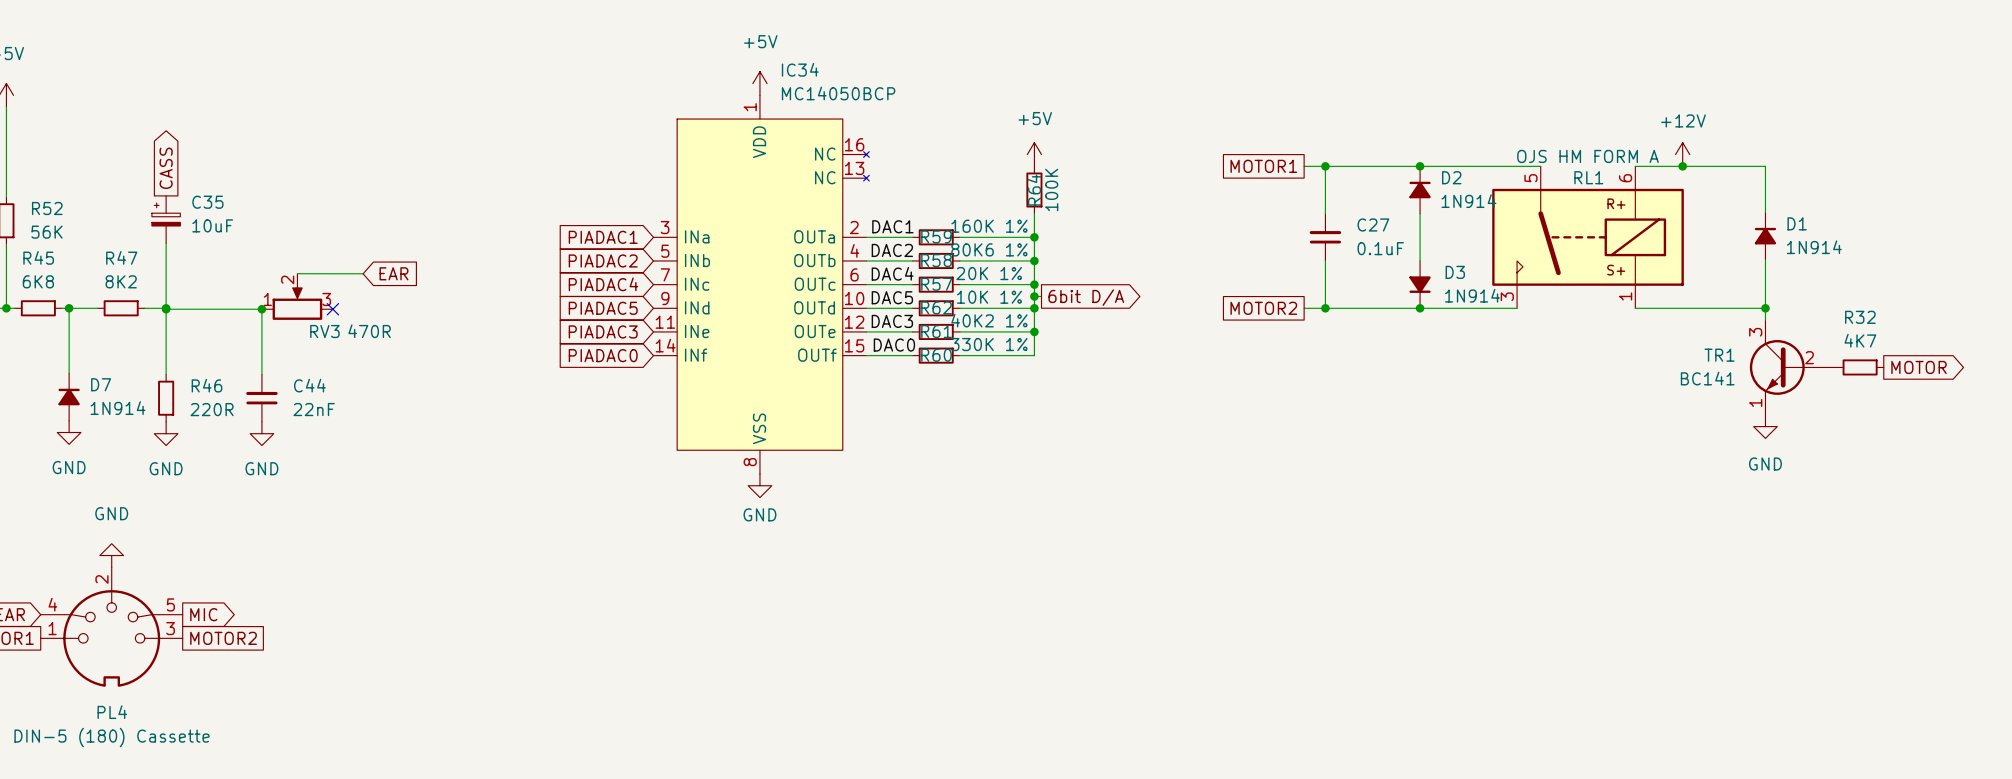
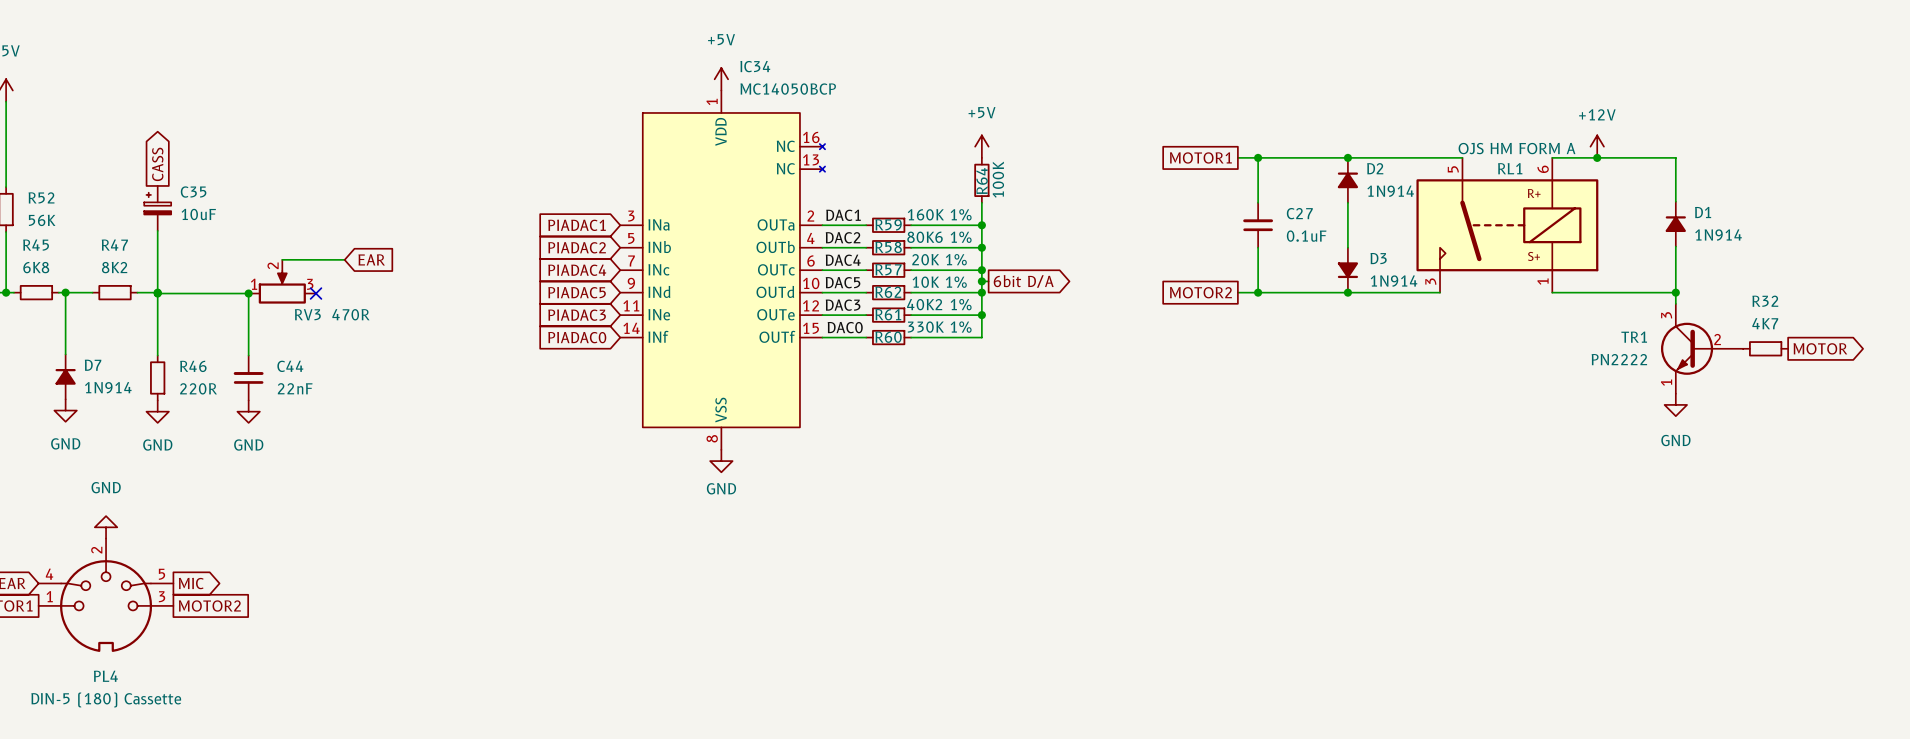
TR1 value: BC141 (1707, 378) -> PN2222 (1619, 359)

